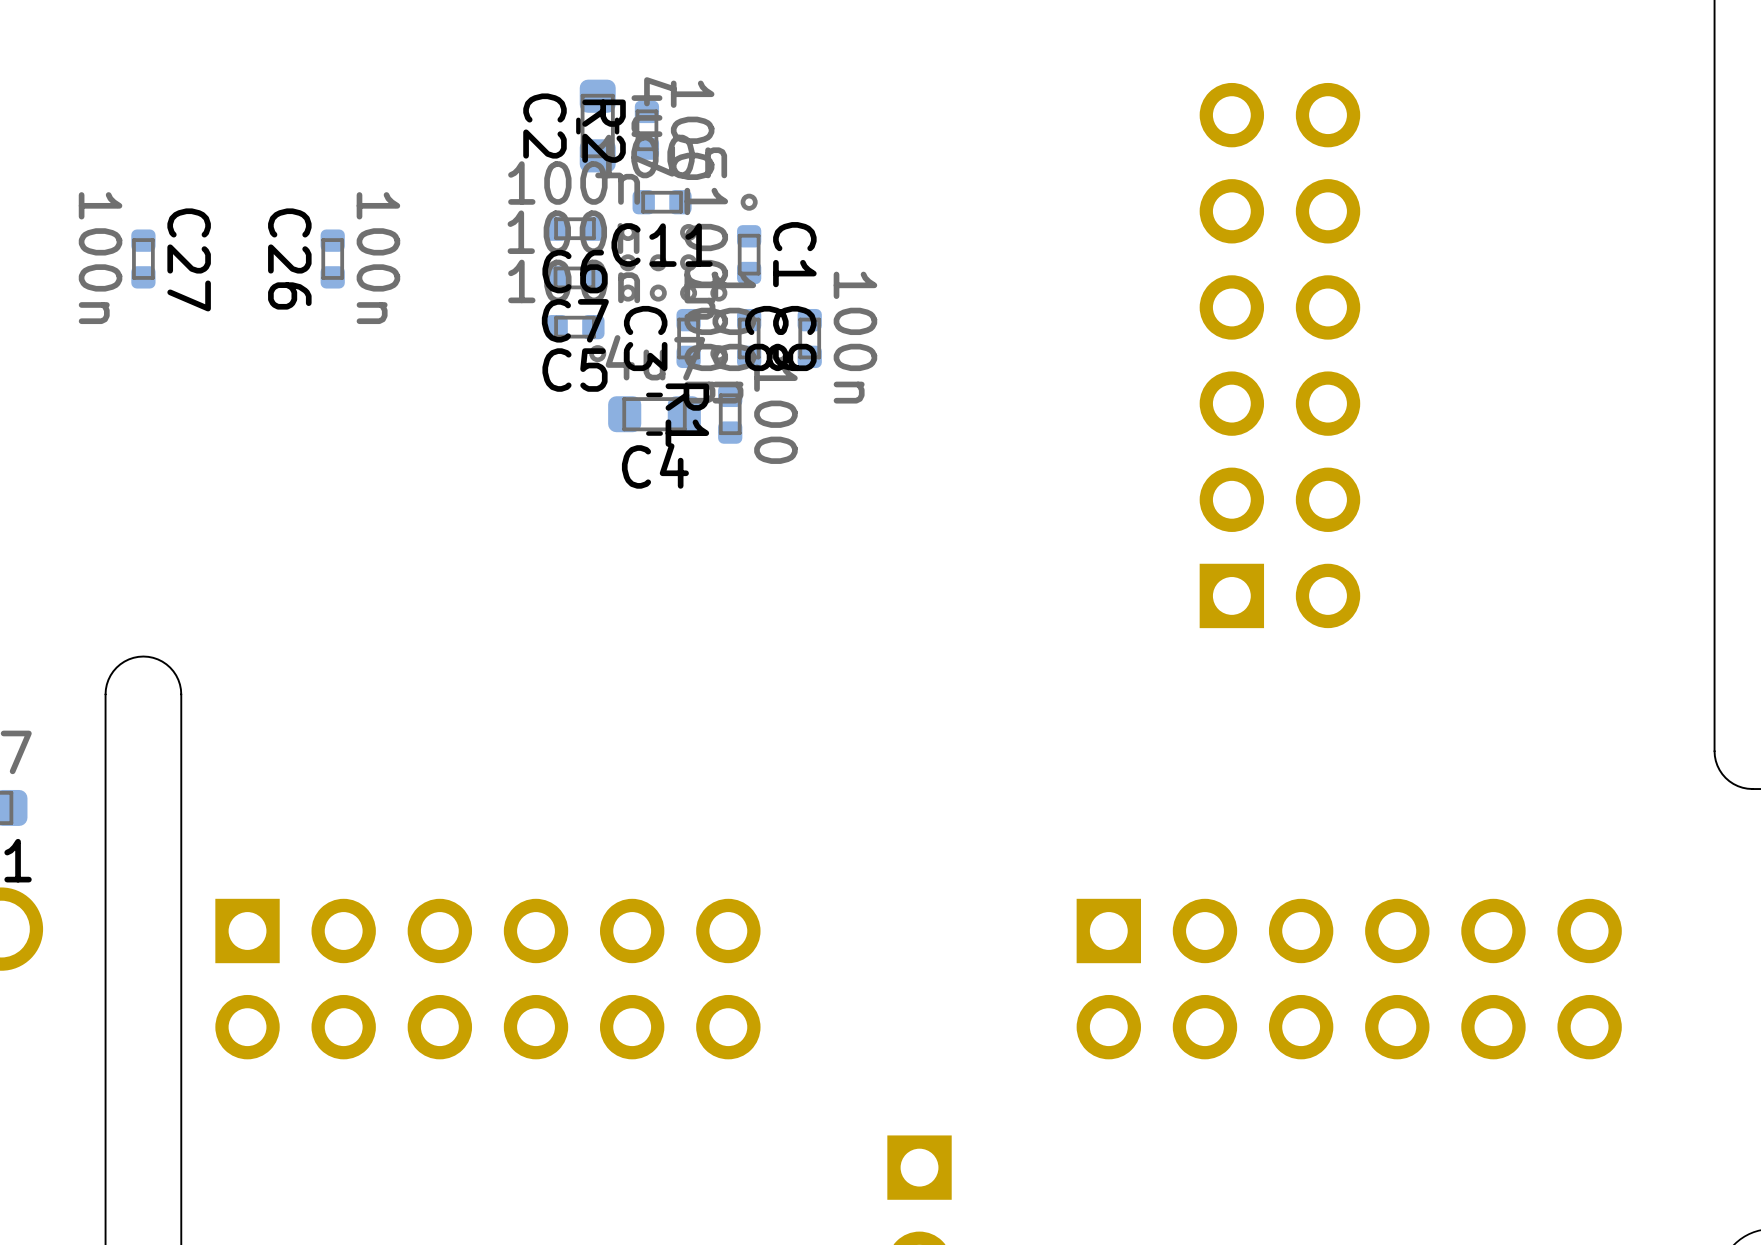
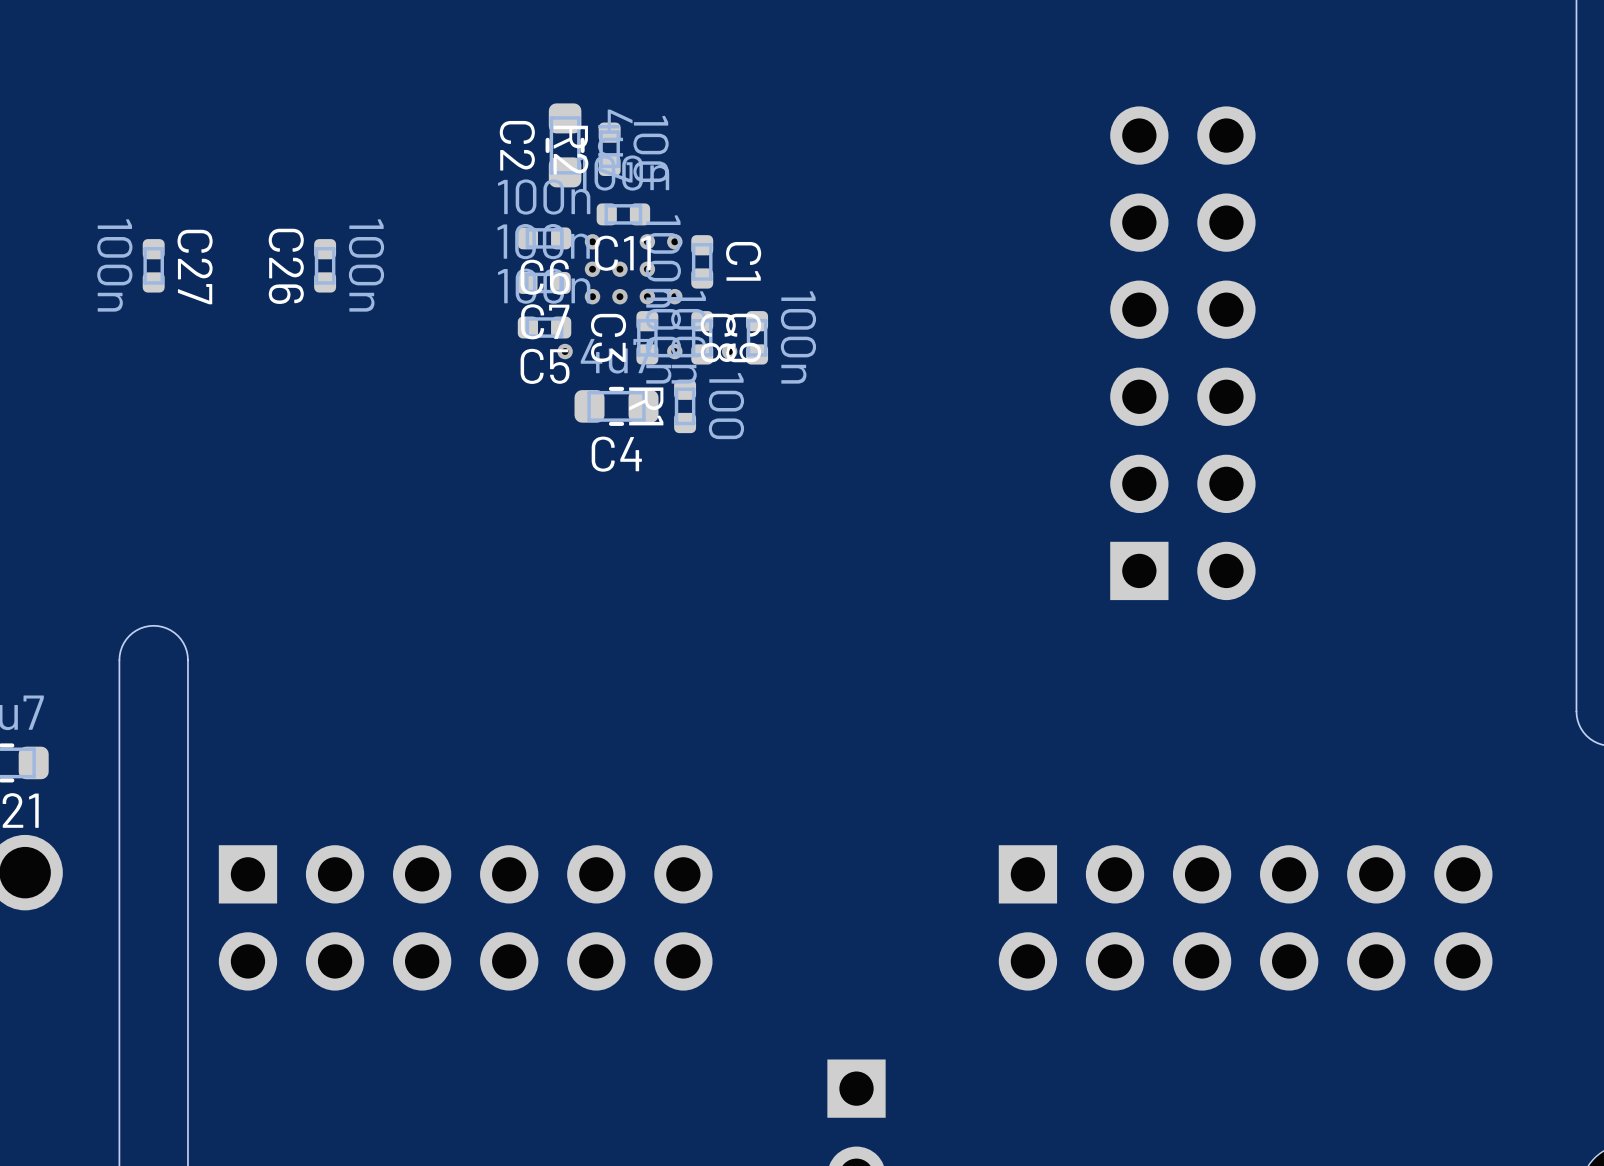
via position: (749, 202) -> (674, 241)

